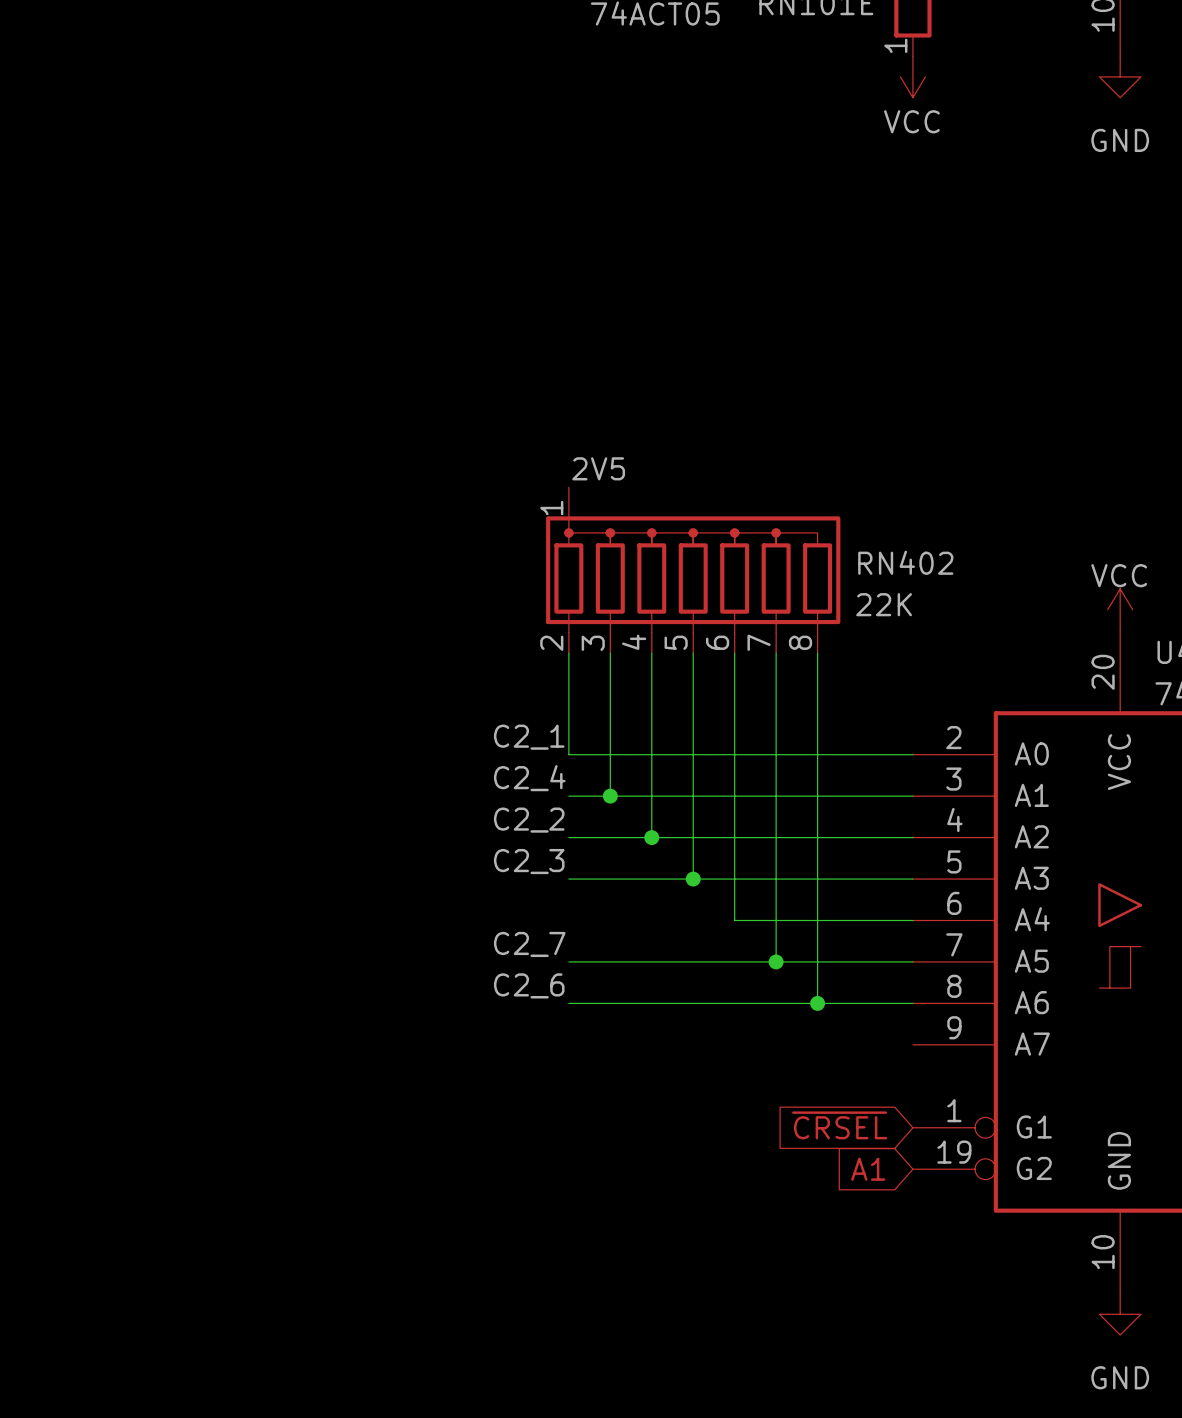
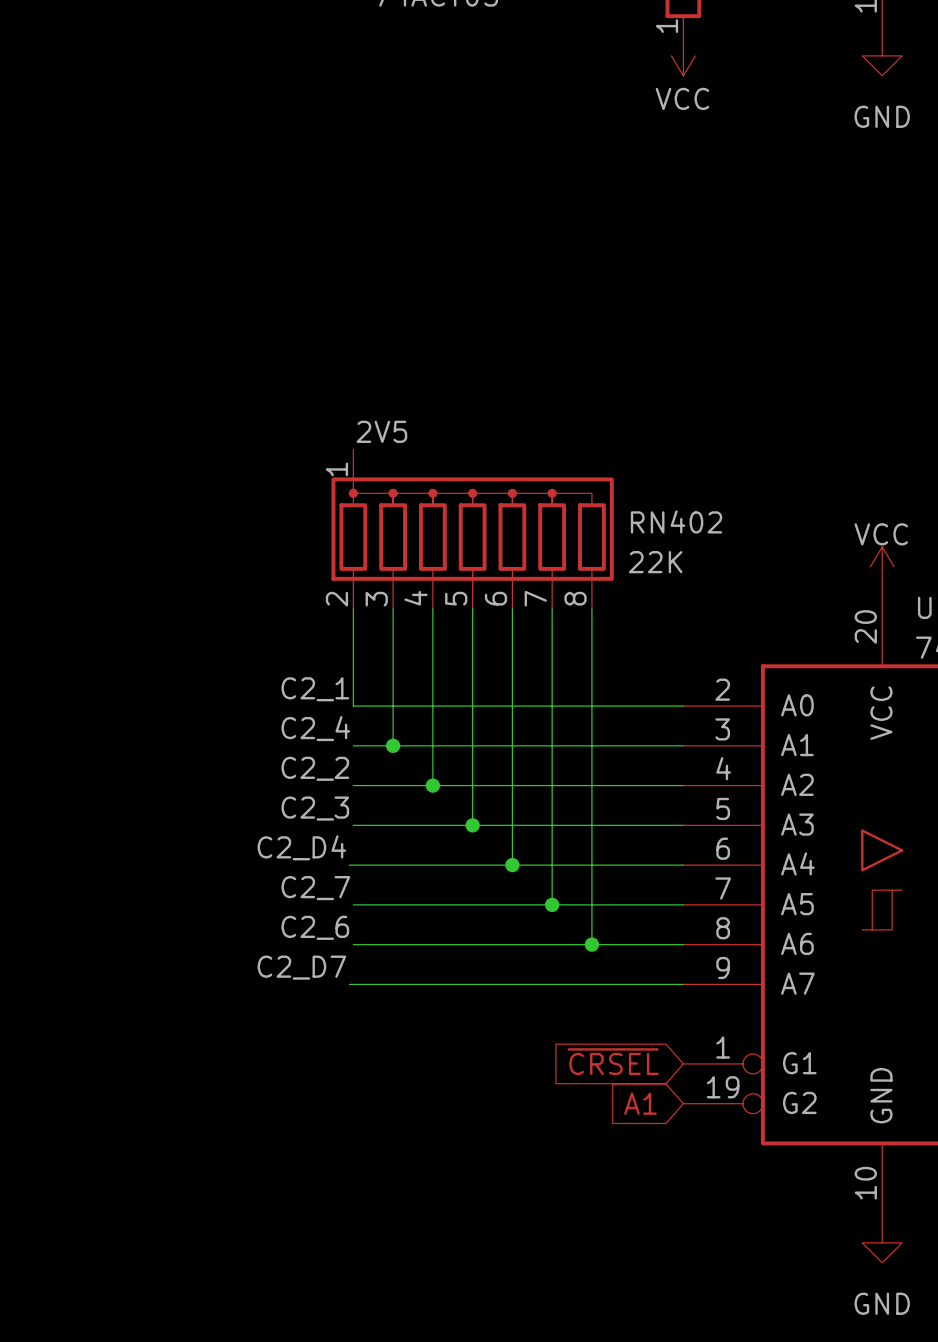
label: none -> C2_D4 (301, 847)
wire: none -> (349, 865) (512, 865)
junction: none -> (512, 865)
label: none -> C2_D7 (301, 967)
wire: none -> (349, 984) (683, 984)

